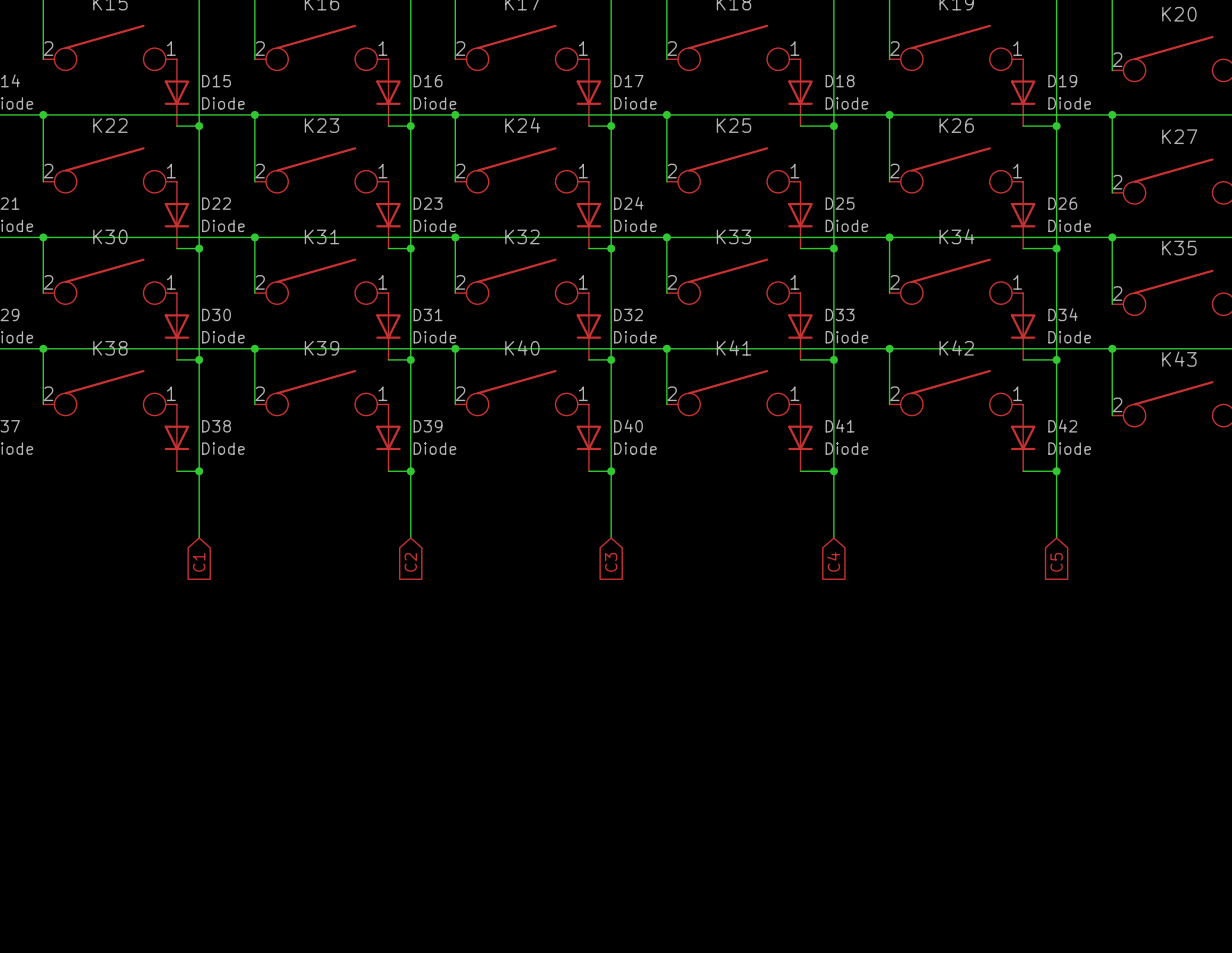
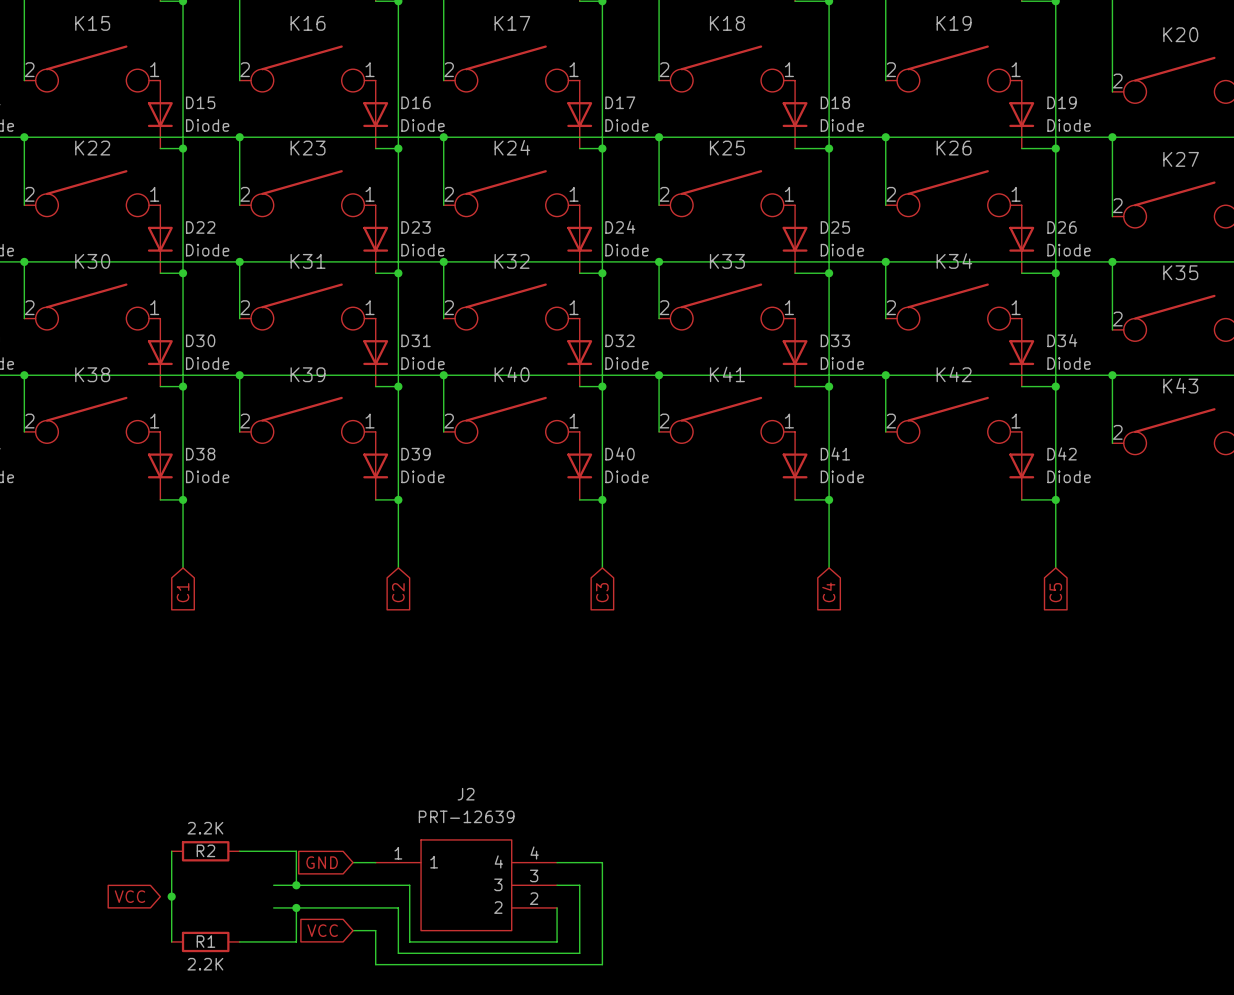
wire: none -> (171, 851) (171, 941)
R2: none -> 2.2K (205, 851)
wire: none -> (239, 851) (296, 851) (296, 885)
global label: none -> GND (322, 862)
wire: none -> (353, 862) (375, 862)
wire: none -> (557, 862) (602, 862) (602, 964) (375, 964) (375, 930) (353, 930)
wire: none -> (273, 885) (409, 885) (409, 941) (557, 941) (557, 907)
junction: none -> (296, 885)
J2: none -> PRT-12639 (466, 885)
wire: none -> (557, 885) (579, 885) (579, 953) (398, 953) (398, 907) (273, 907)
global label: none -> VCC (129, 896)
junction: none -> (171, 896)
wire: none -> (296, 907) (296, 941) (239, 941)
junction: none -> (296, 907)
global label: none -> VCC (322, 930)
R1: none -> 2.2K (205, 941)

